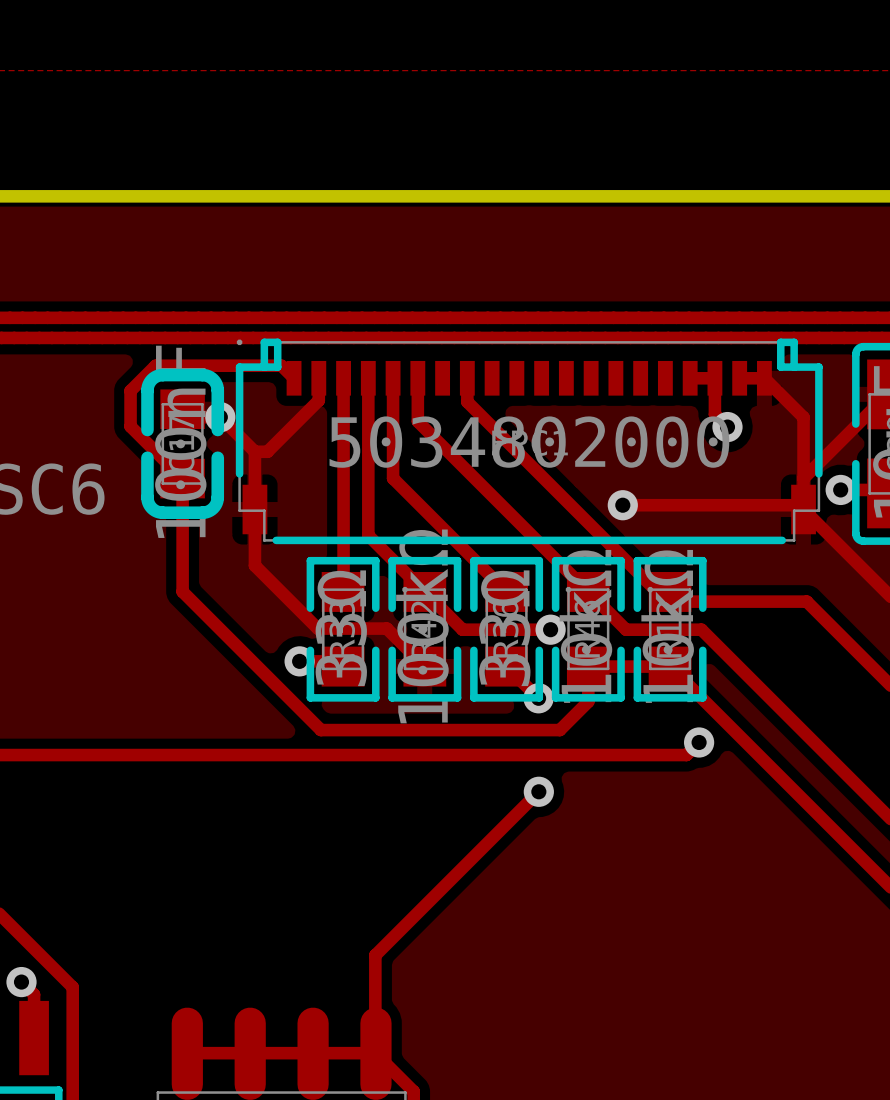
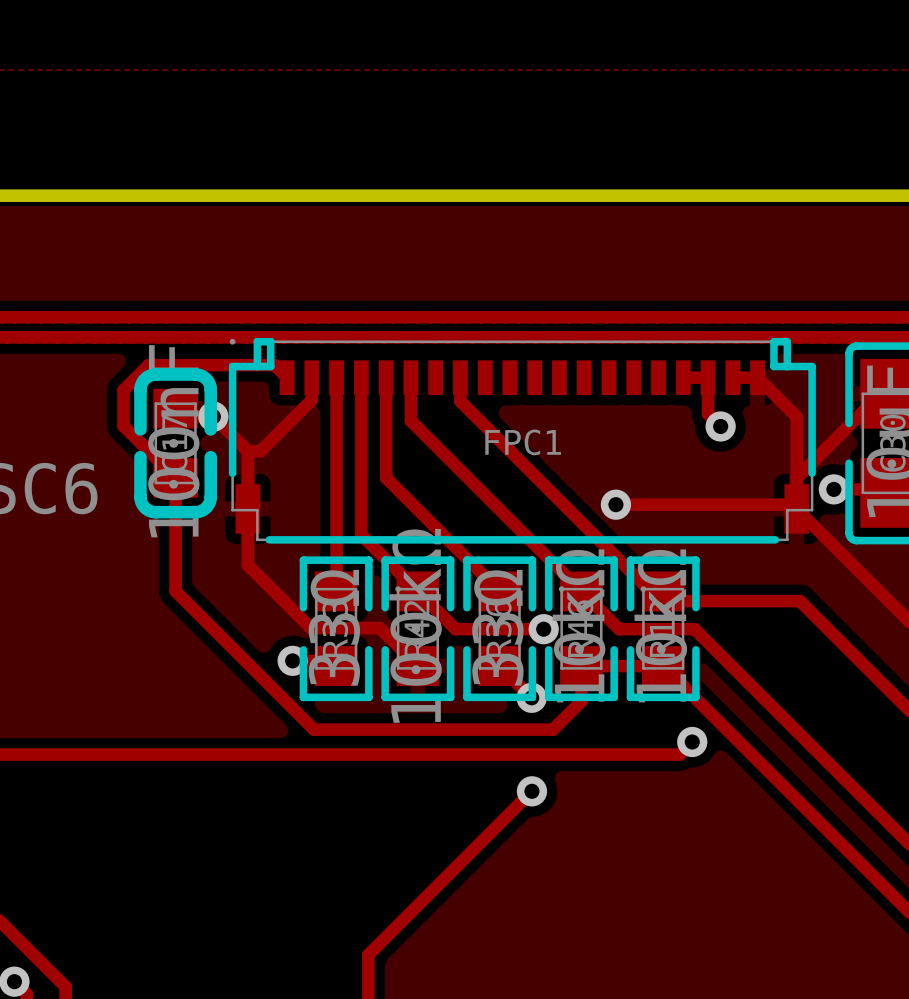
FPC1 value: 5034802000 (529, 442) -> none

